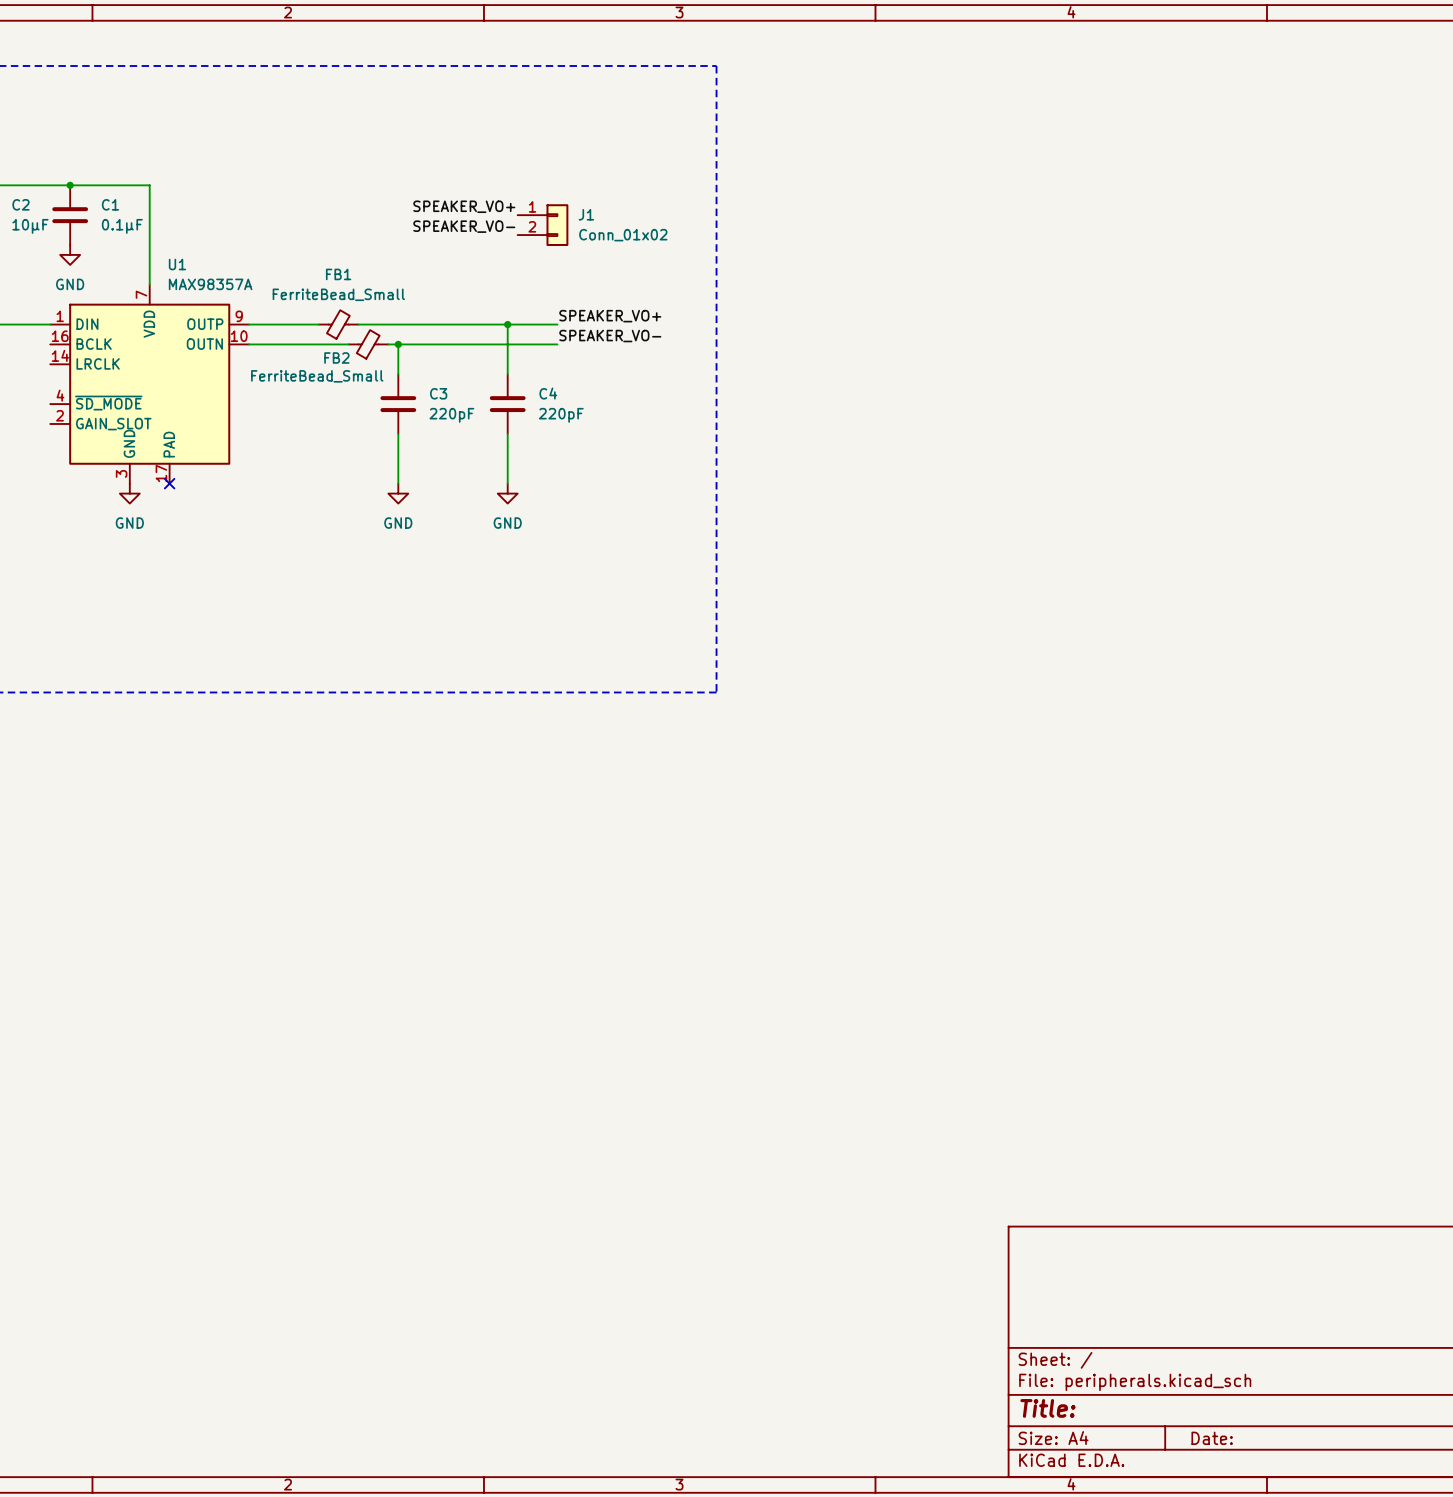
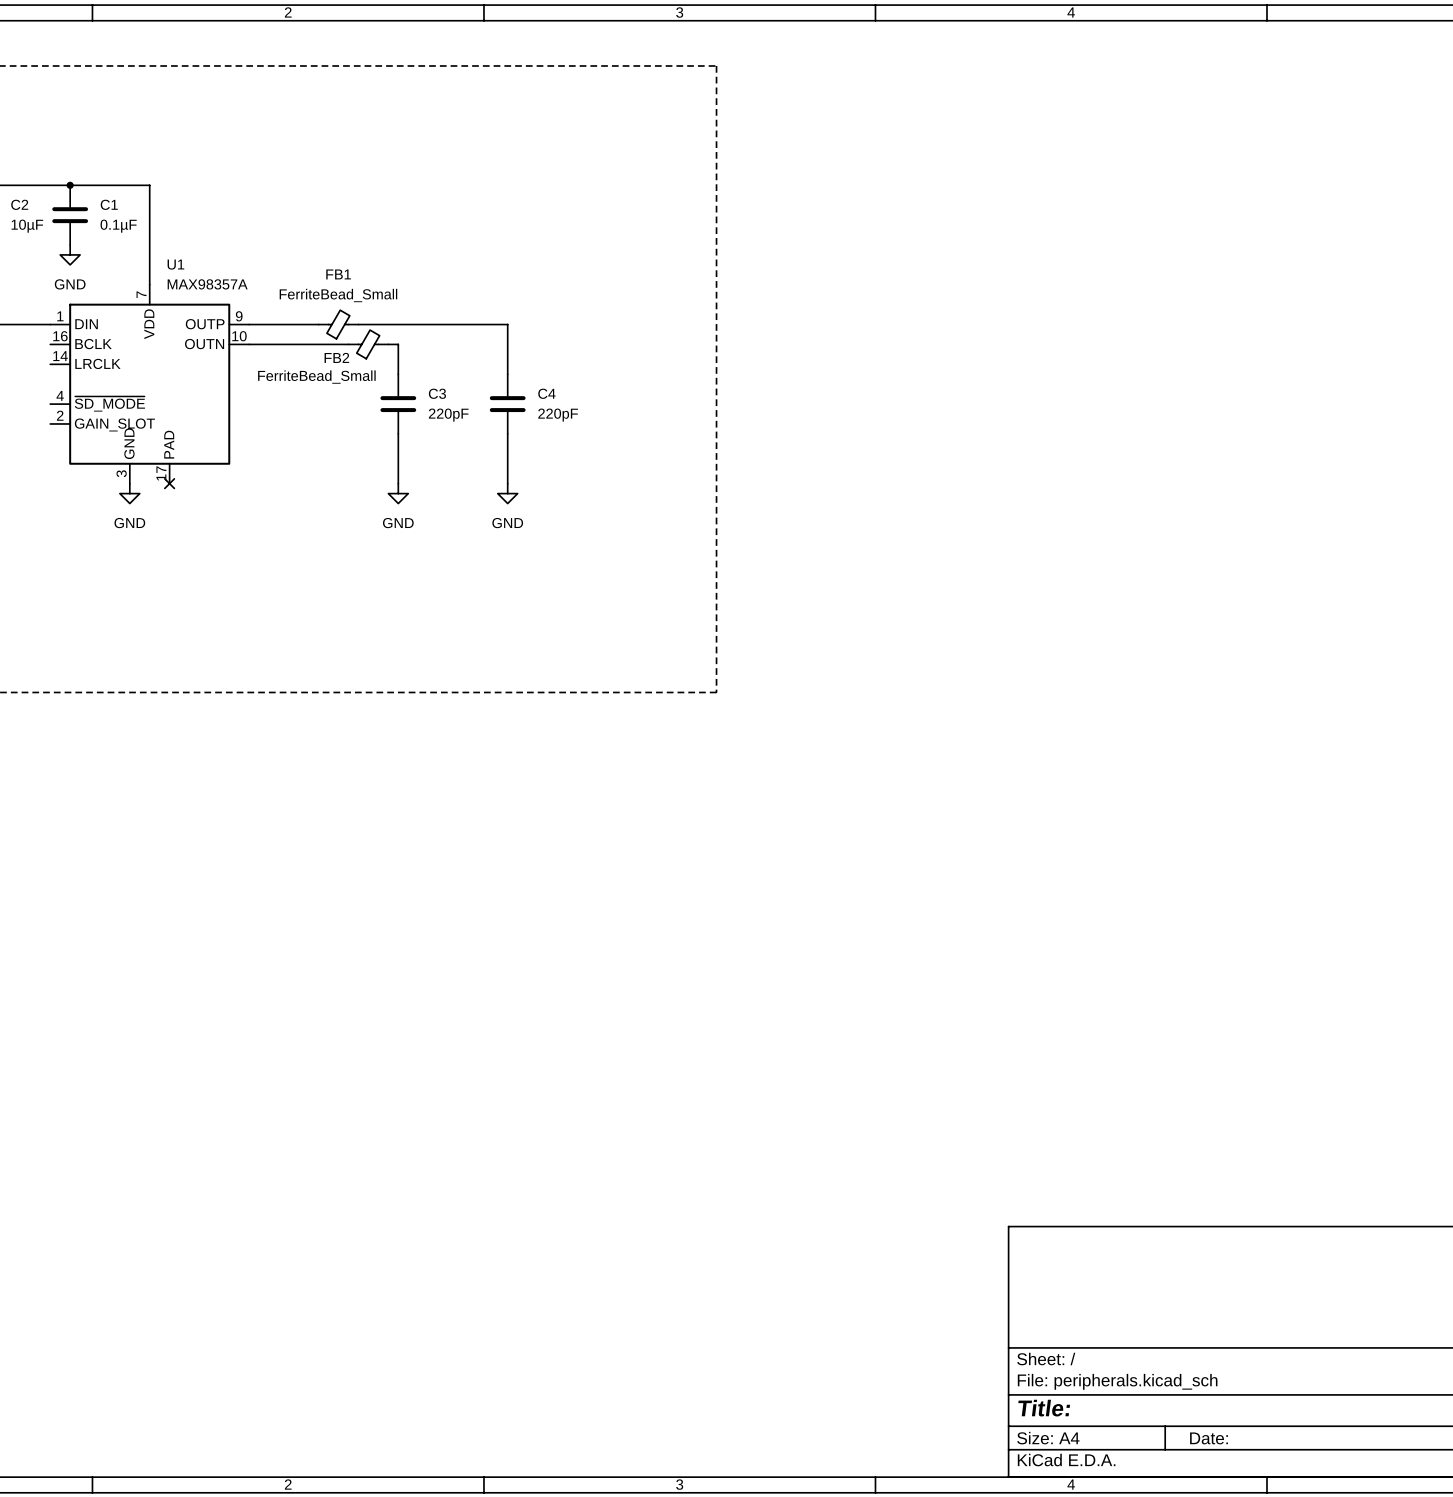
label: SPEAKER_VO+ (464, 206) -> none
J1: Conn_01x02 (543, 225) -> none
label: SPEAKER_VO- (464, 226) -> none
label: SPEAKER_VO+ (610, 316) -> none
wire: (507, 324) (557, 324) -> none
junction: (507, 324) -> none
label: SPEAKER_VO- (610, 336) -> none
wire: (398, 344) (557, 344) -> none
junction: (398, 344) -> none

